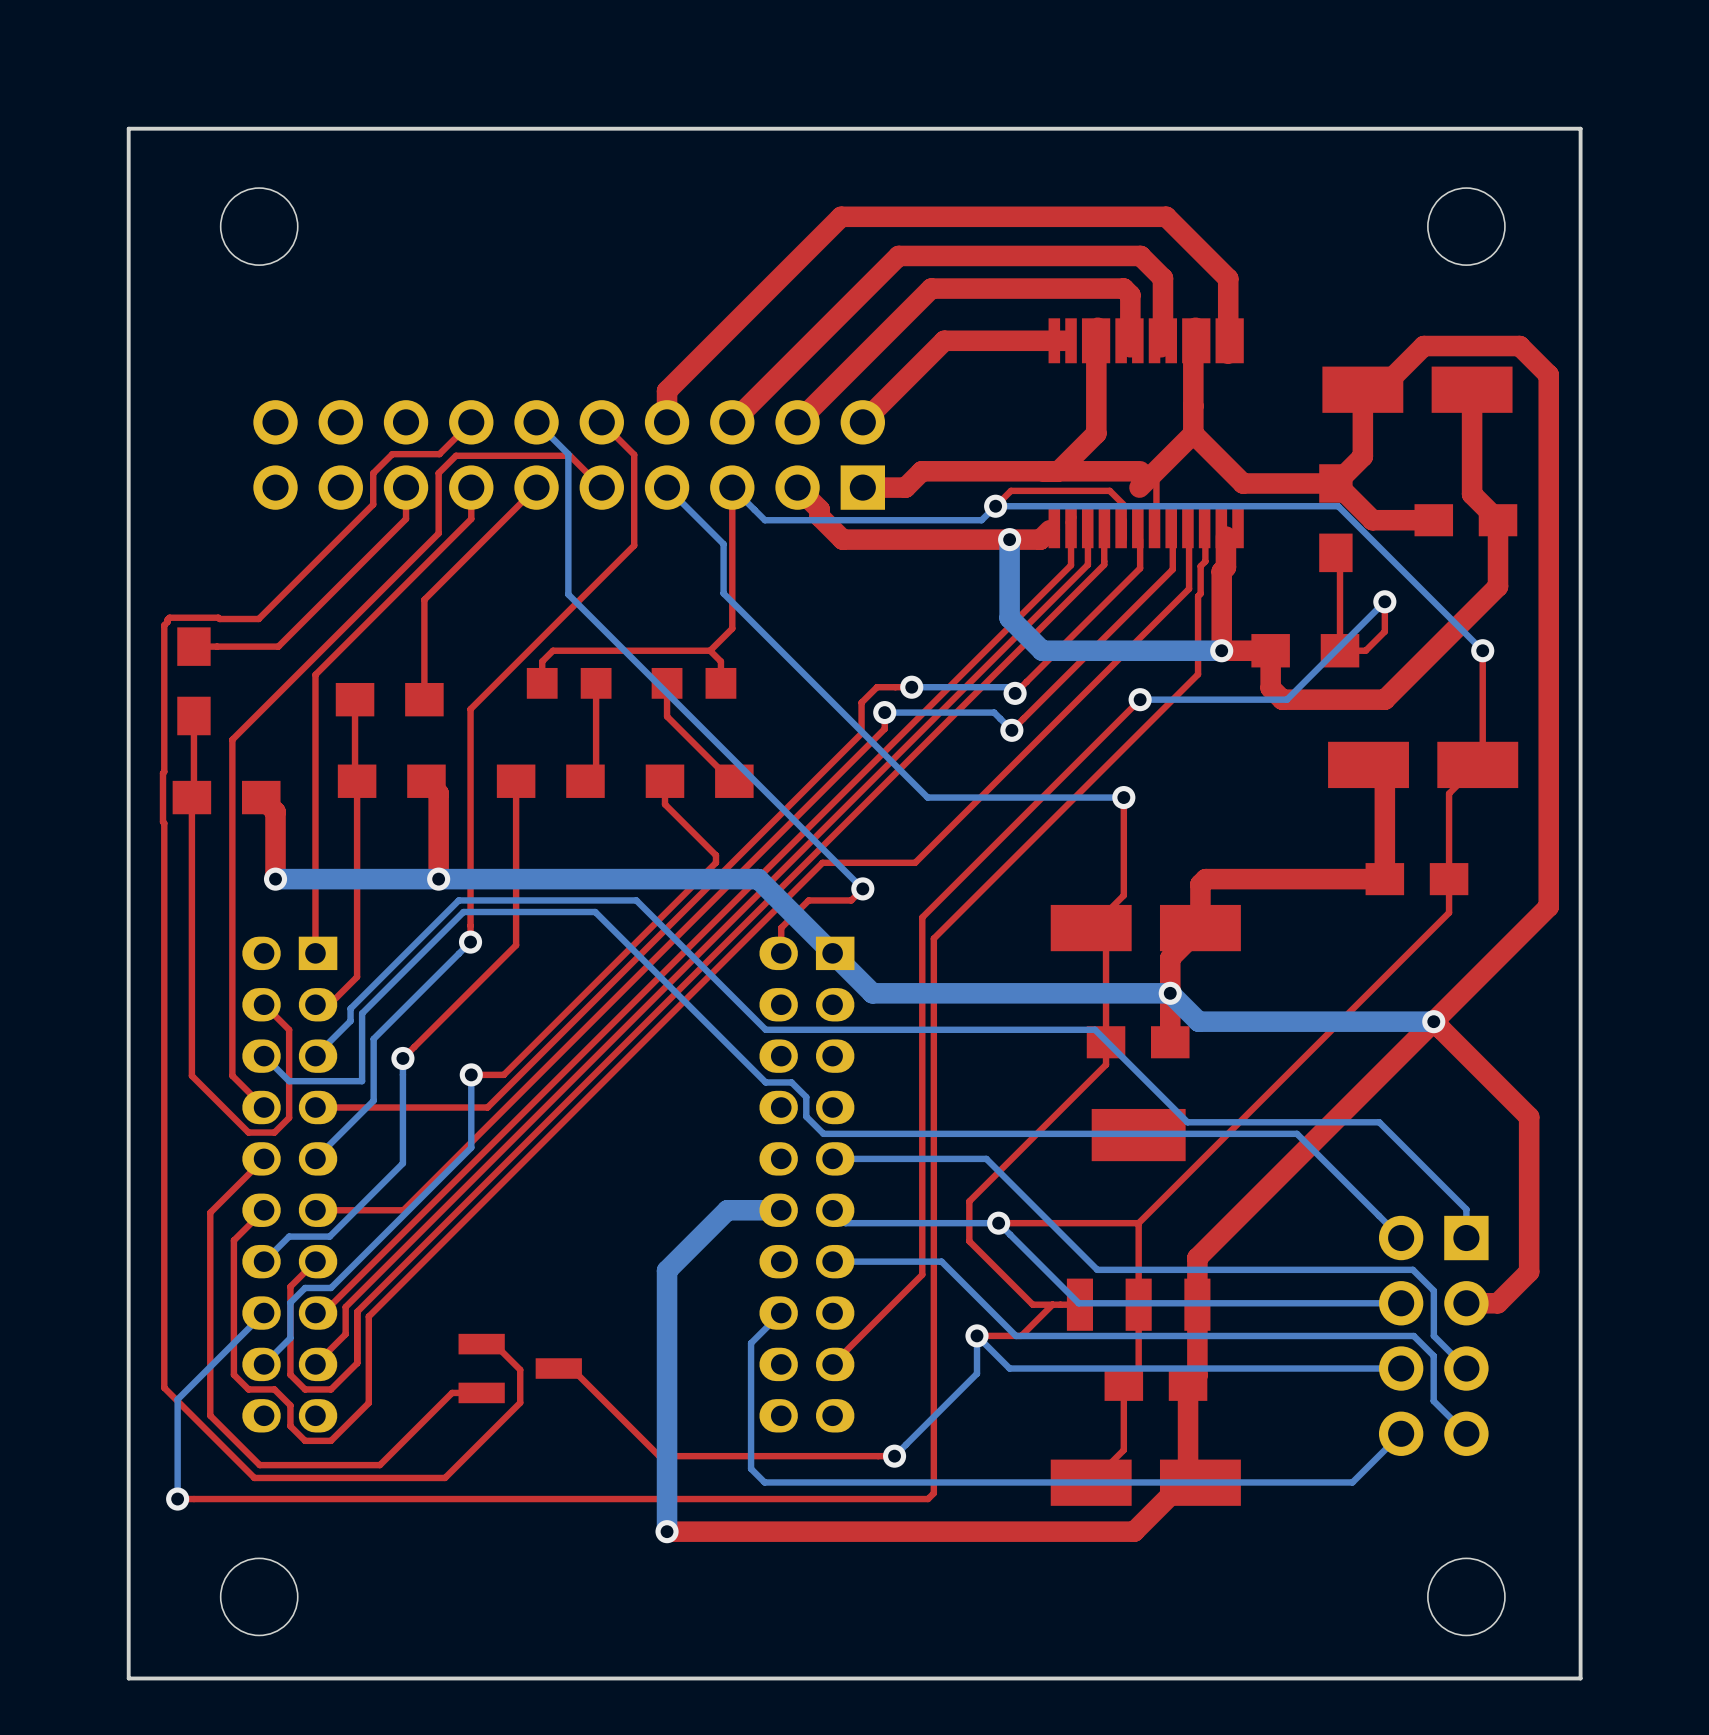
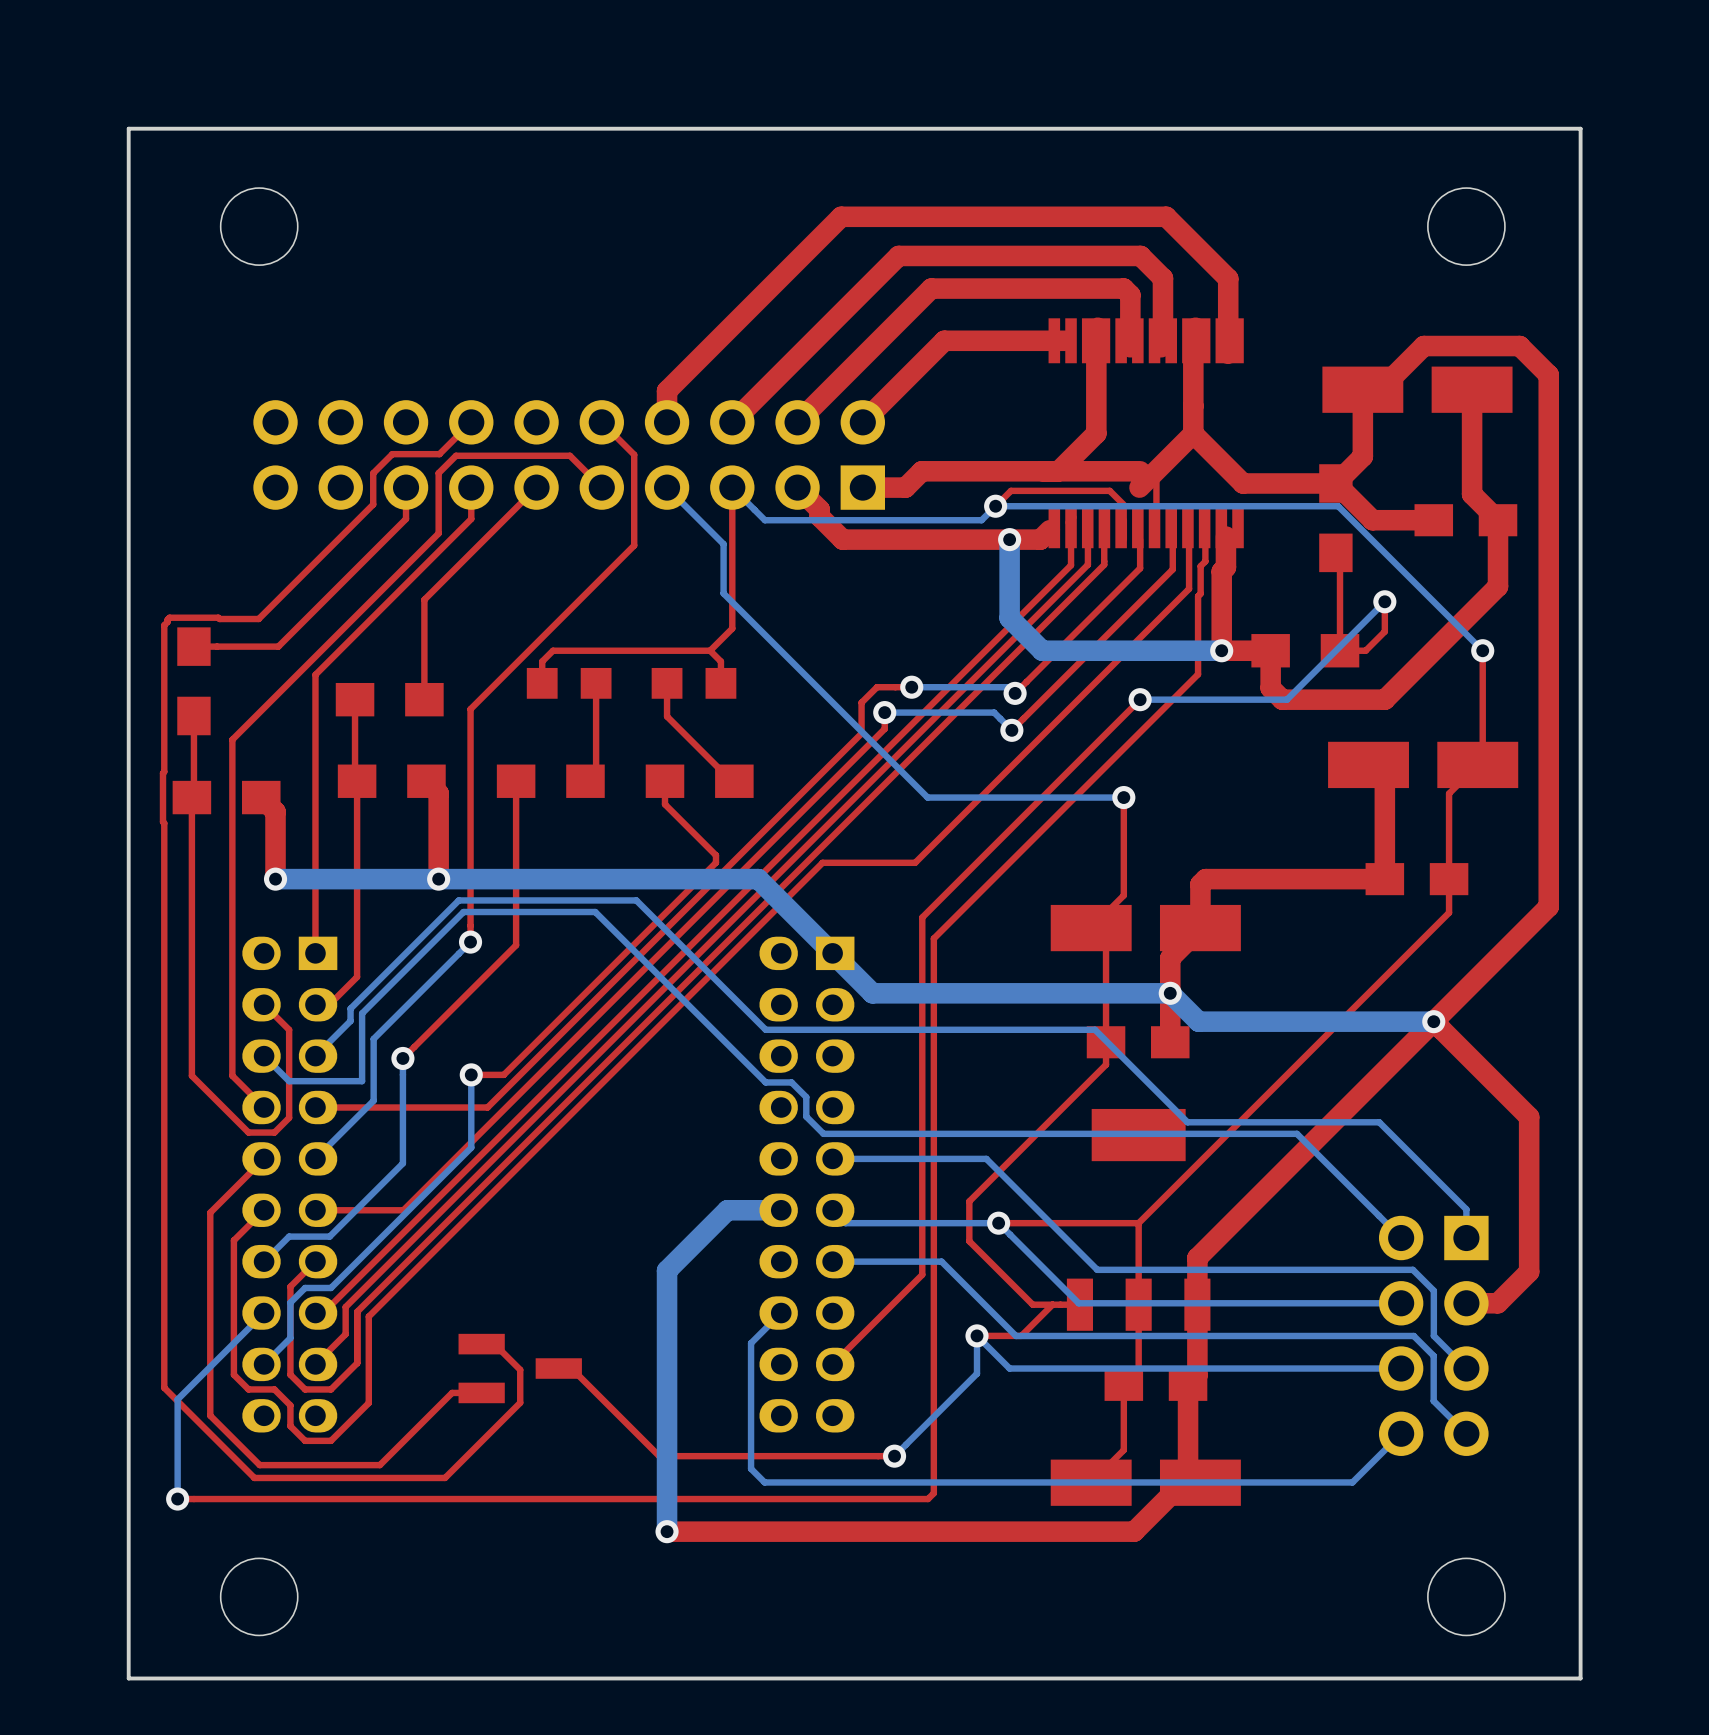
bottom track: (536, 422) (568, 454) (568, 594) (862, 888) -> none
top track: (862, 888) (851, 900) (808, 900) (781, 927) (781, 953) -> none
via: (862, 888) -> none

